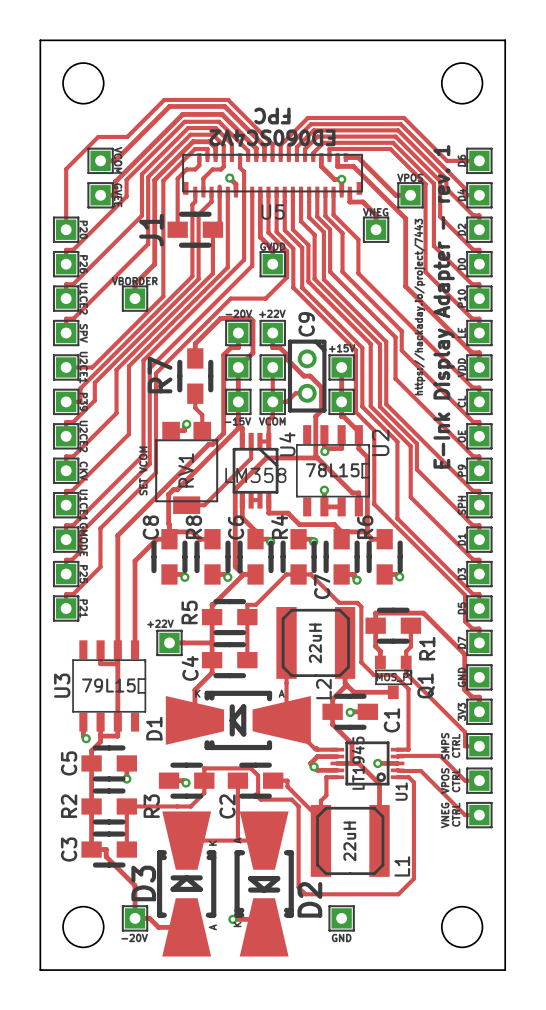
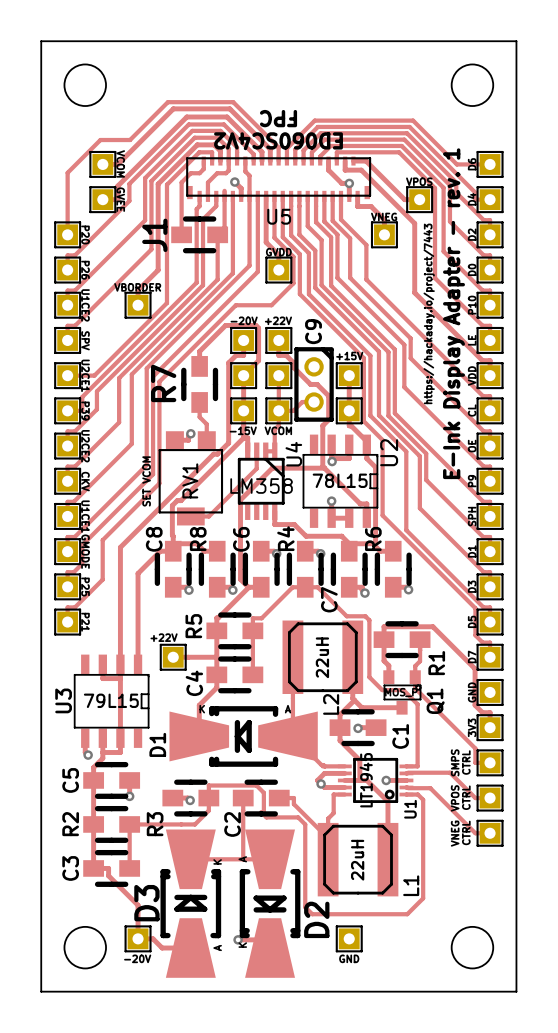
track: (242, 500) (242, 517) (255, 531) (255, 539) -> none
track: (251, 500) (259, 500) -> none

